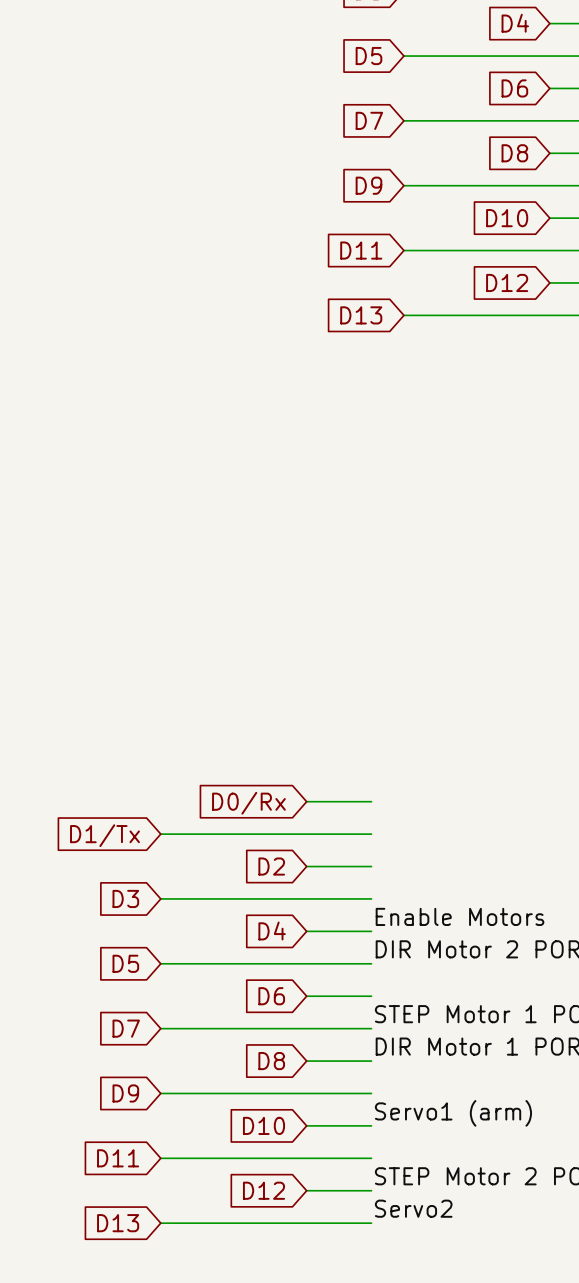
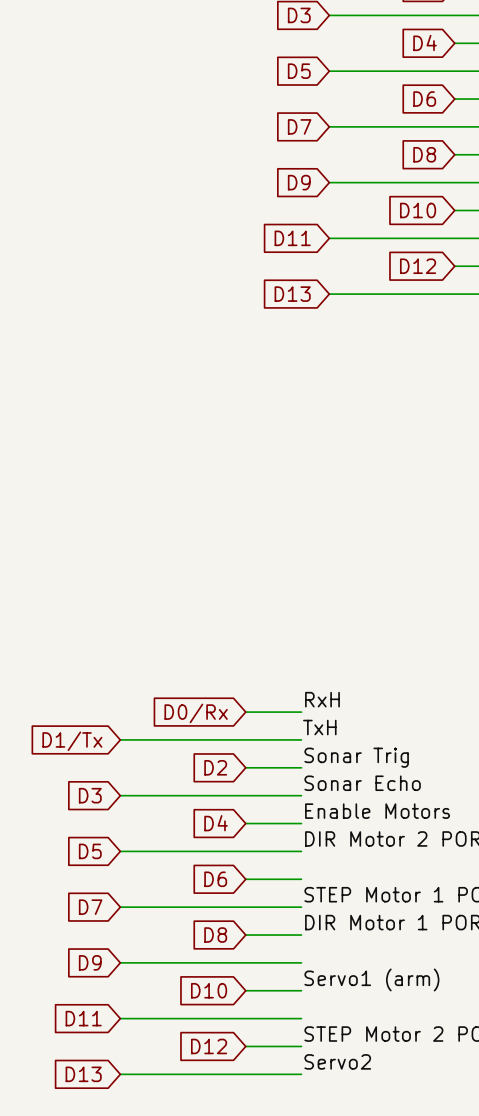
label: none -> RxH (322, 699)
label: none -> TxH (319, 727)
label: none -> Sonar Trig (356, 757)
label: none -> Sonar Echo (362, 783)

